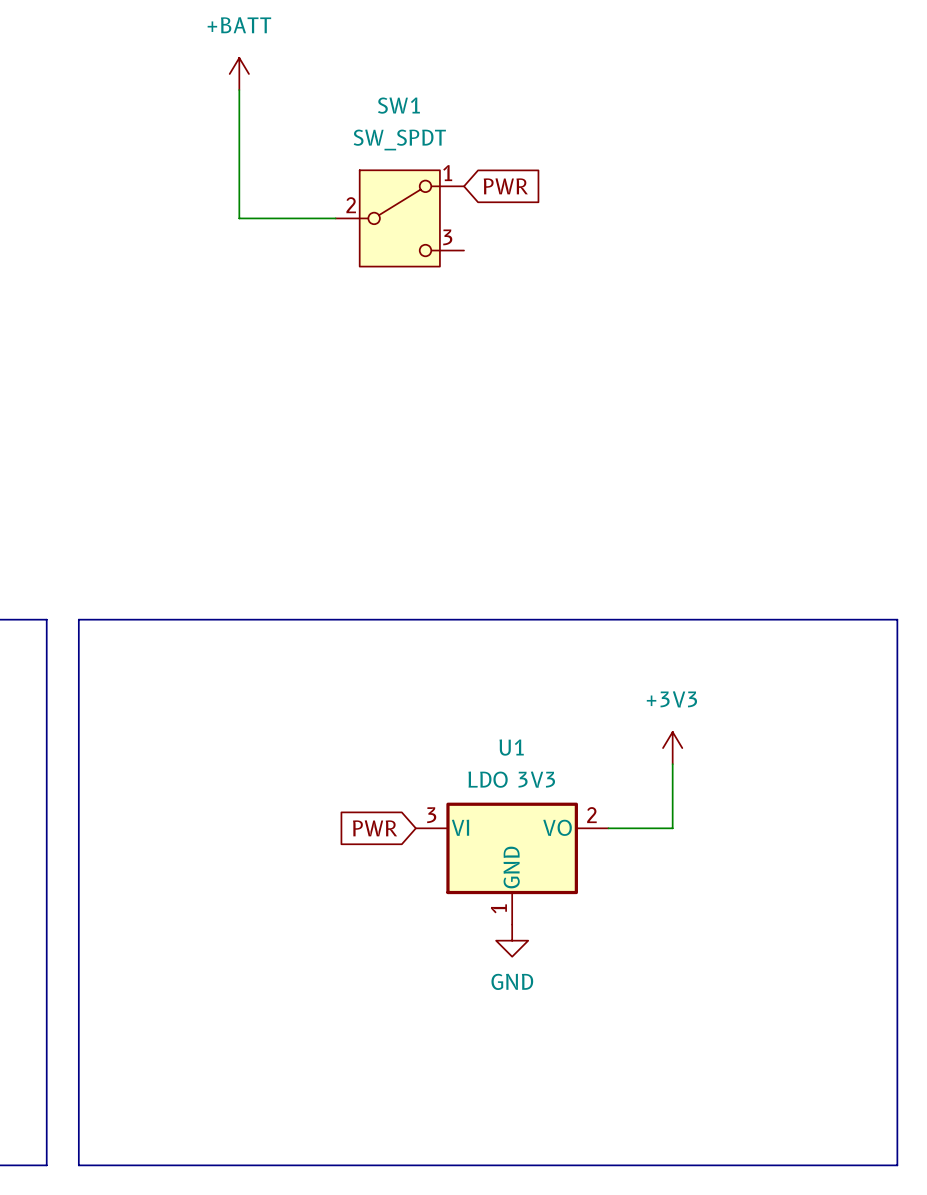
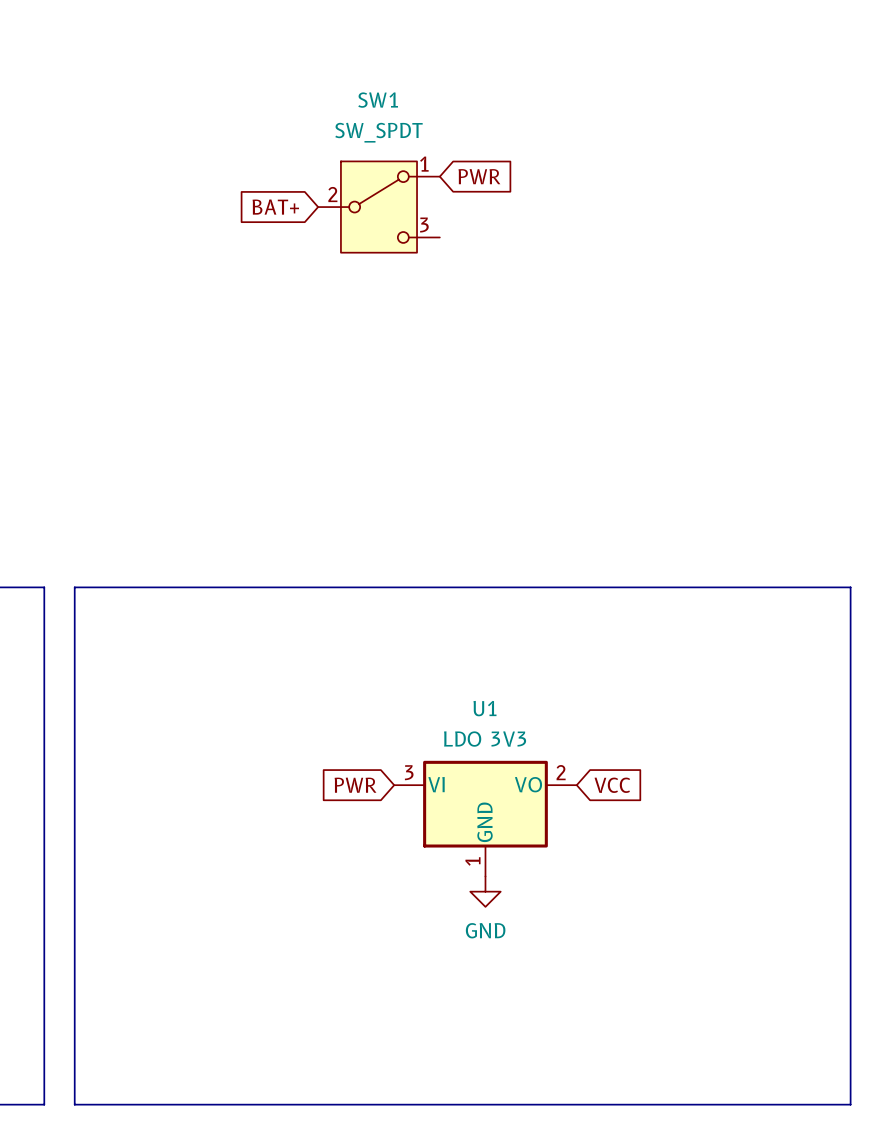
power symbol: +BATT (239, 73) -> none
wire: (239, 90) (239, 218) (335, 218) -> none
global label: none -> BAT+ (275, 207)
power symbol: +3V3 (672, 748) -> none
wire: (672, 764) (672, 828) (608, 828) -> none
global label: none -> VCC (612, 785)

